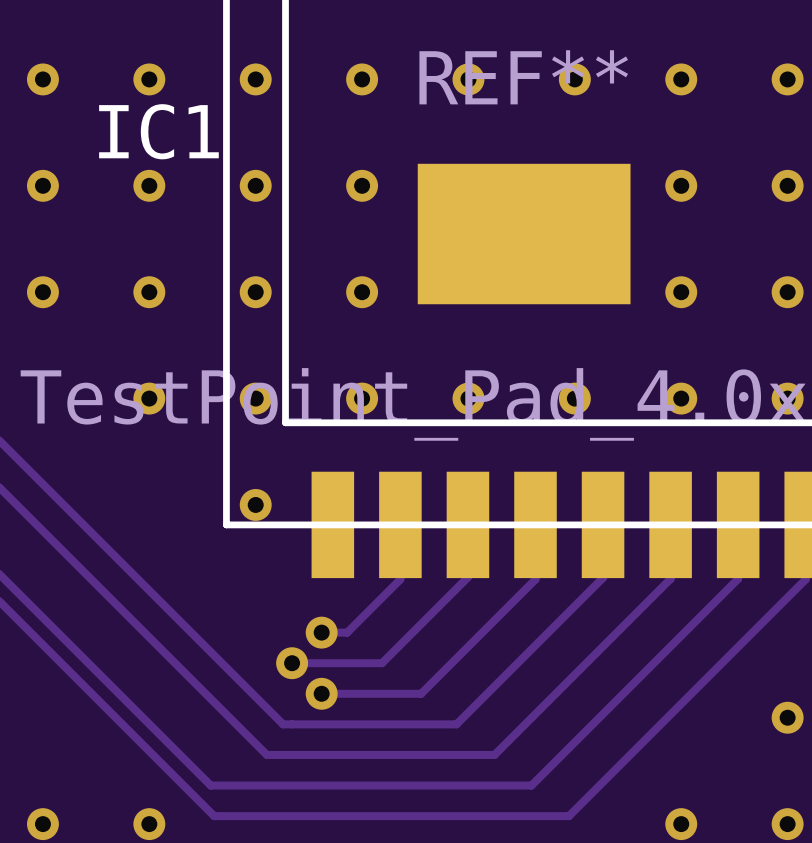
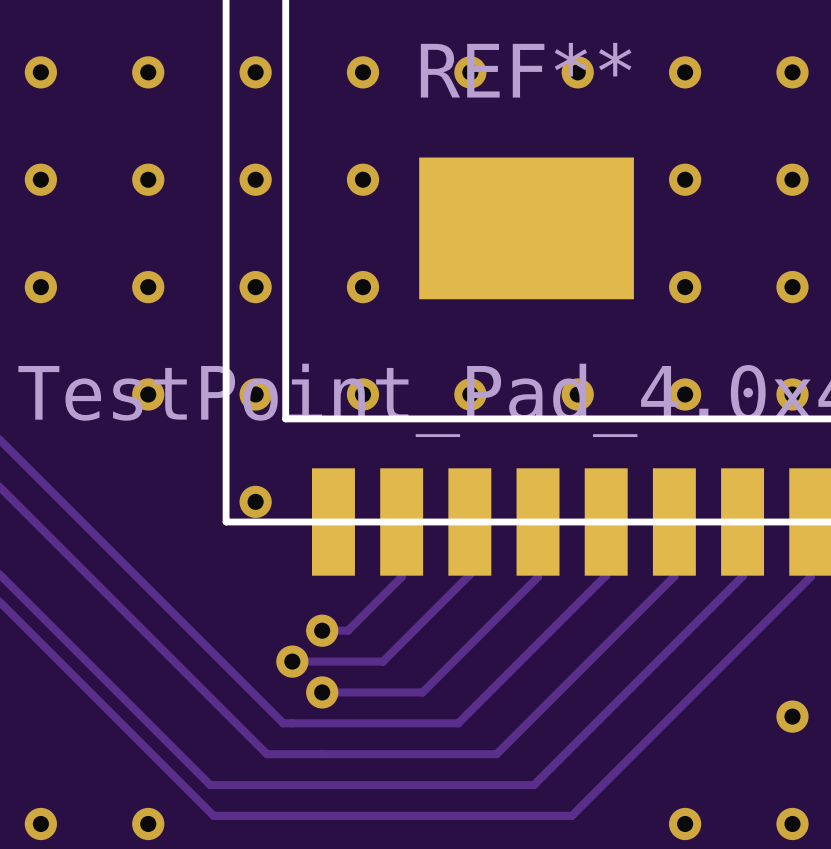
IC1 name: IC1 (158, 131) -> none

